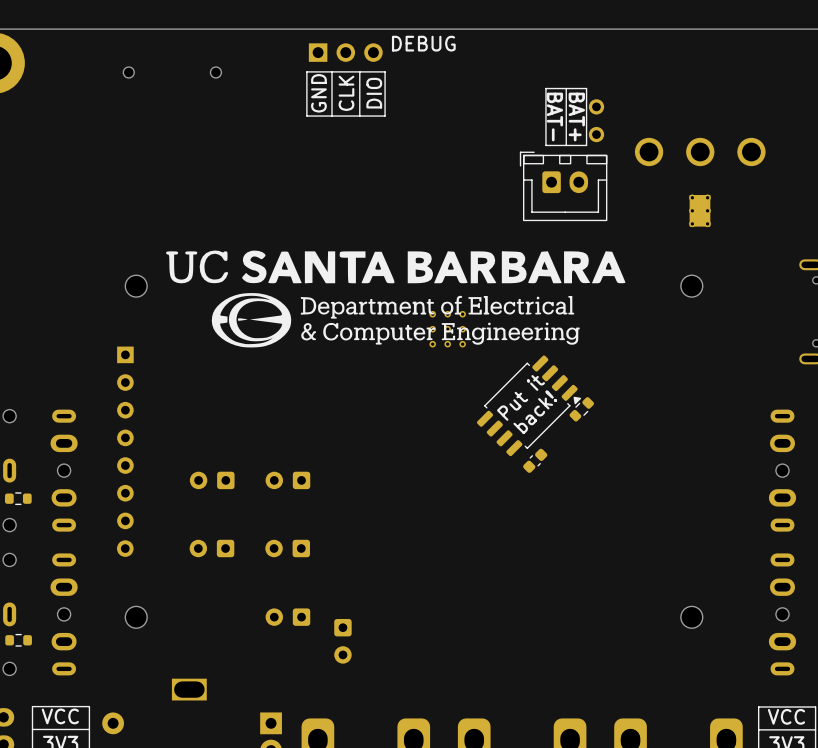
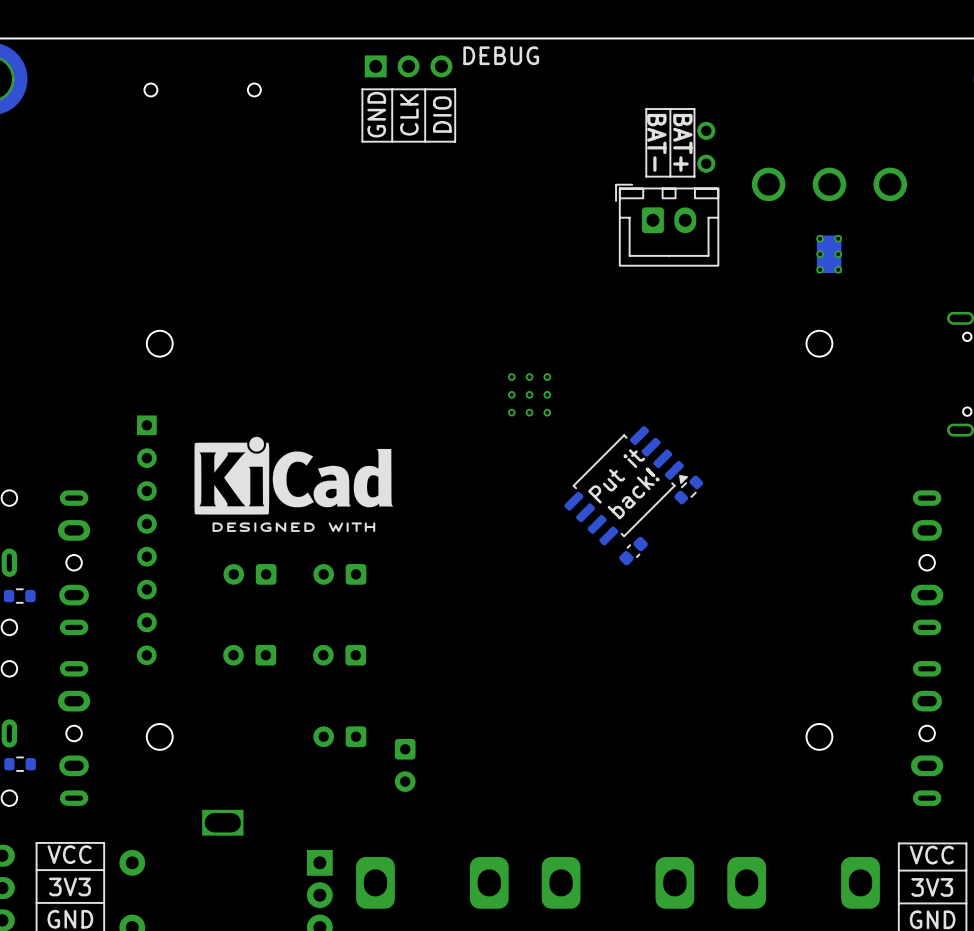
drawing: [166, 250, 626, 348] -> none
drawing: none -> [194, 436, 394, 533]

